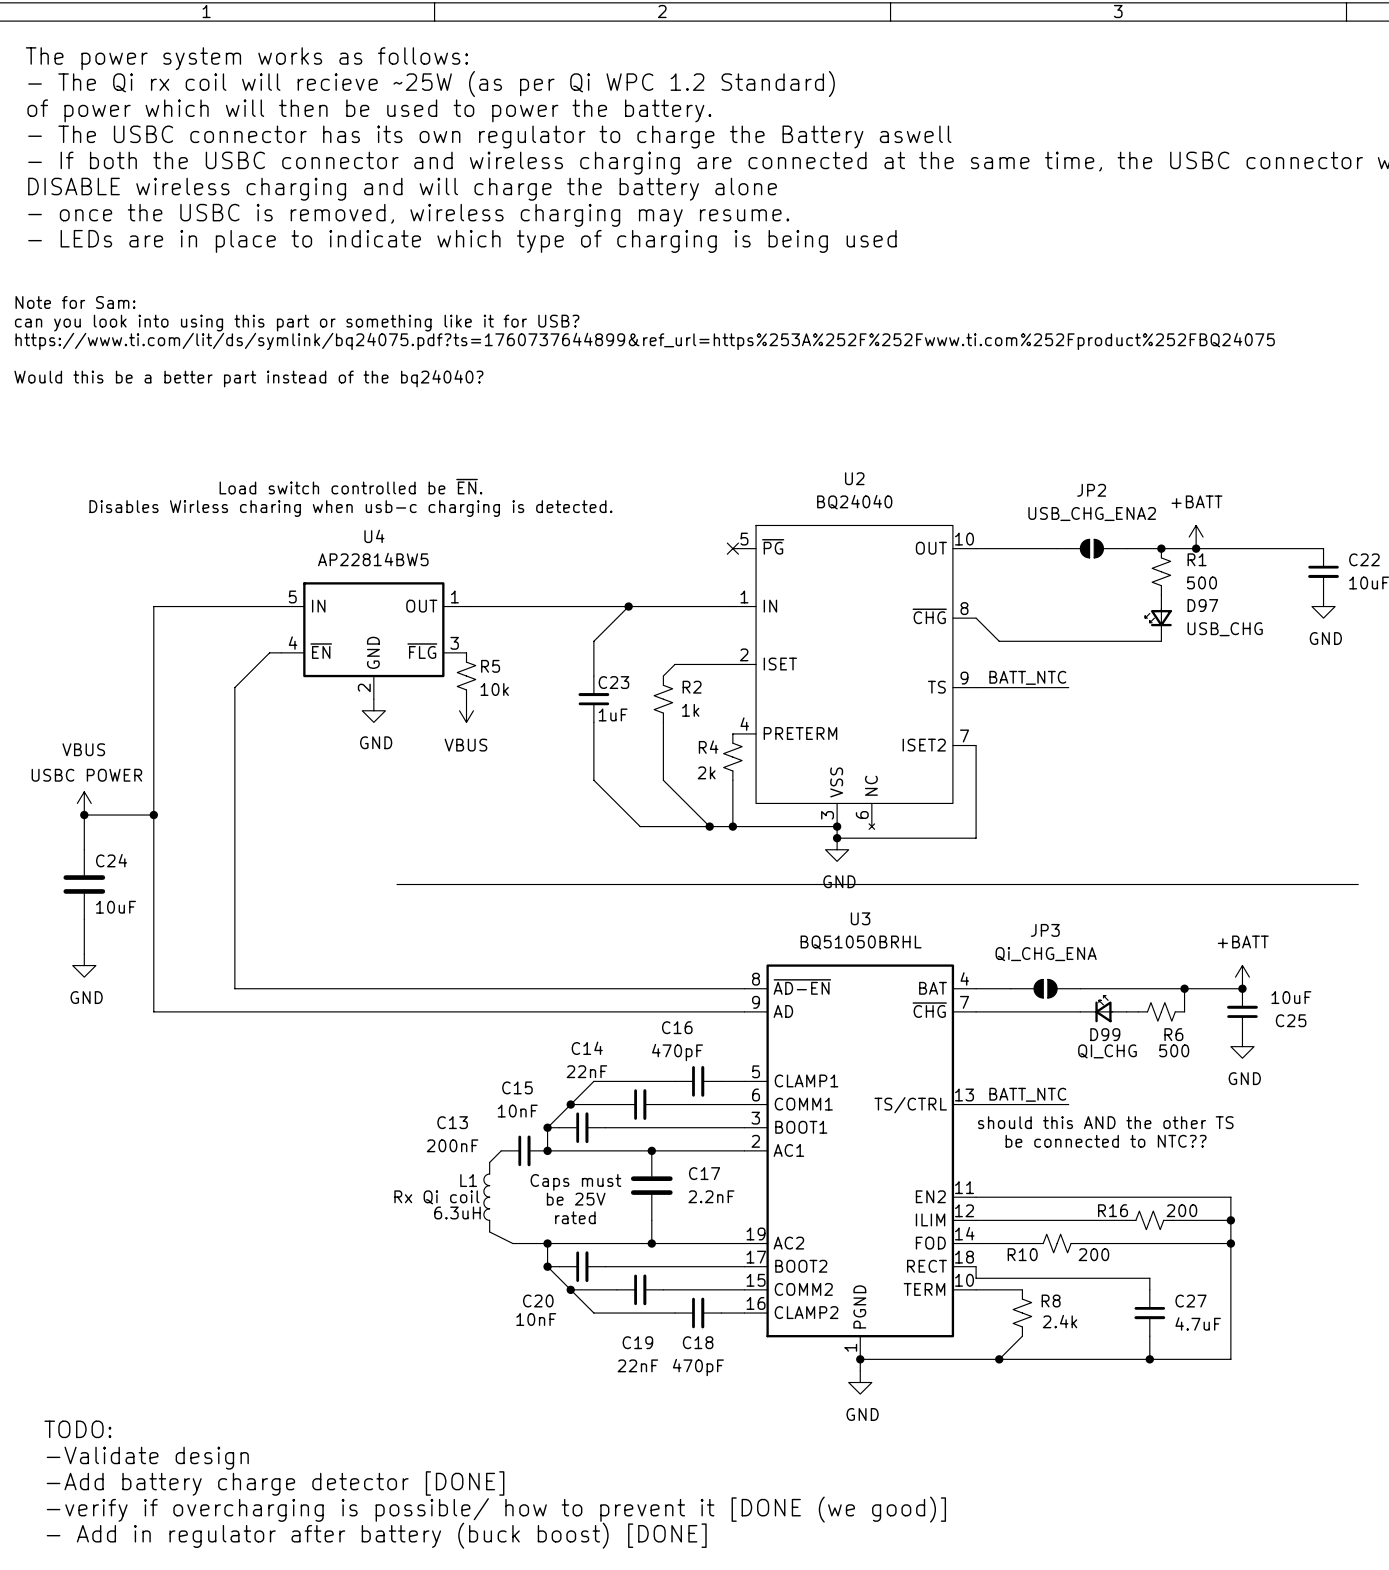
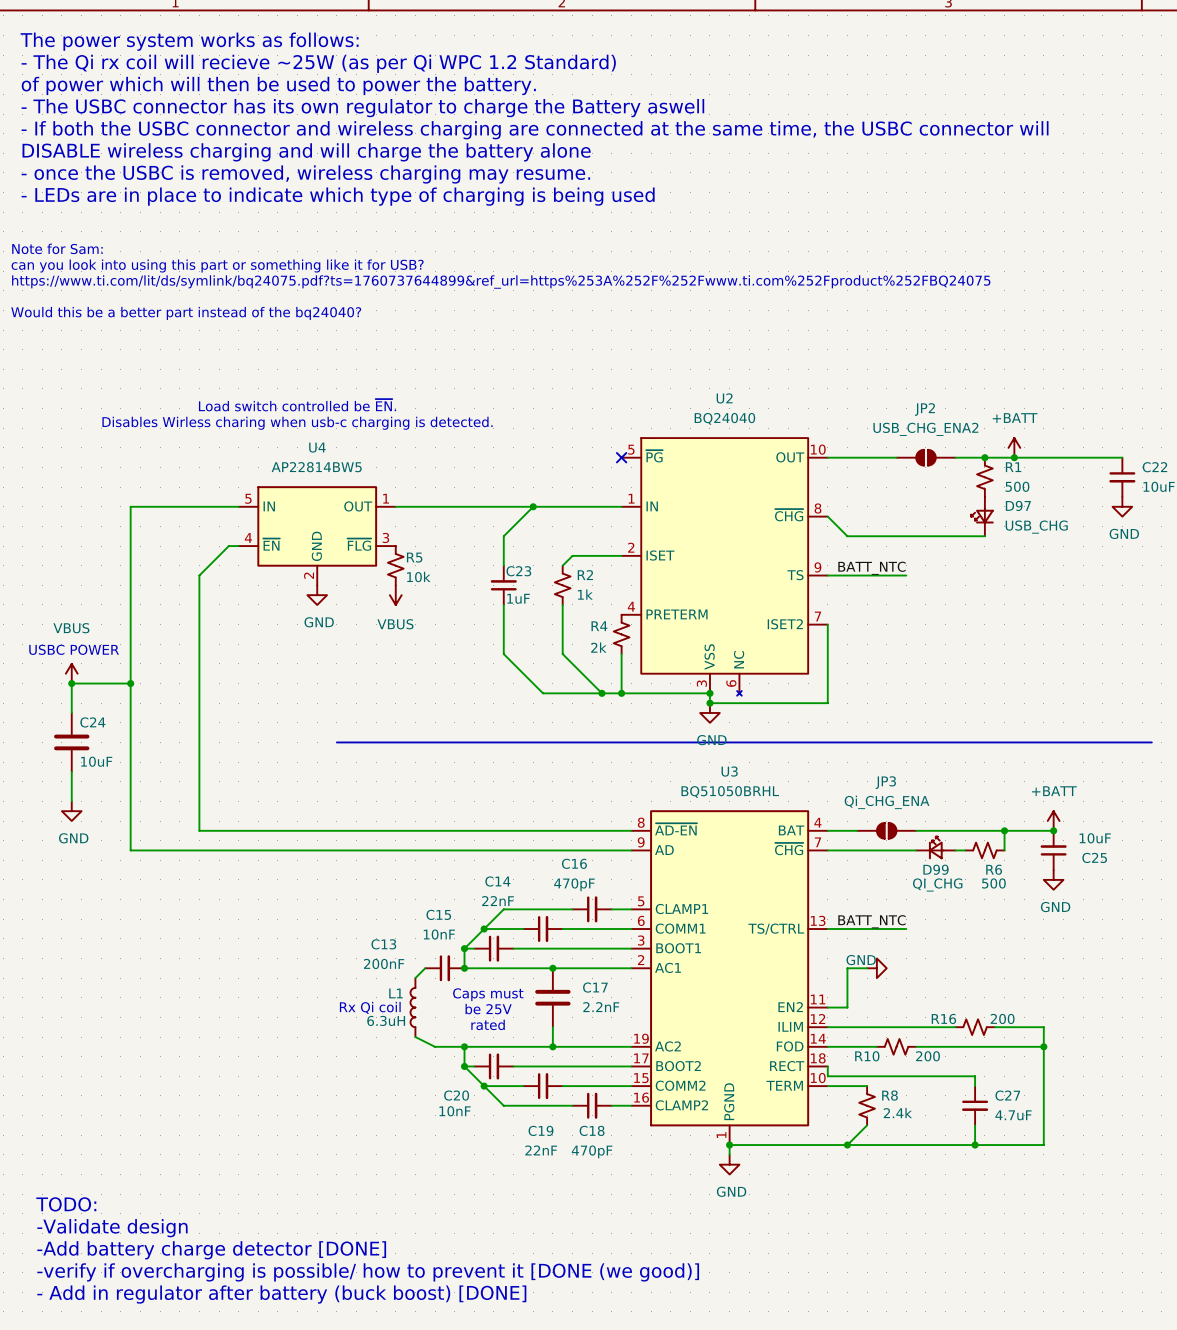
text: should this AND the other TS (1105, 1122) -> none
text: be connected to NTC?? (1106, 1141) -> none
power symbol: none -> GND (876, 968)
wire: (999, 1197) (1230, 1197) (1230, 1220) -> (847, 1007) (847, 968) (867, 968)
junction: (1230, 1220) -> none

